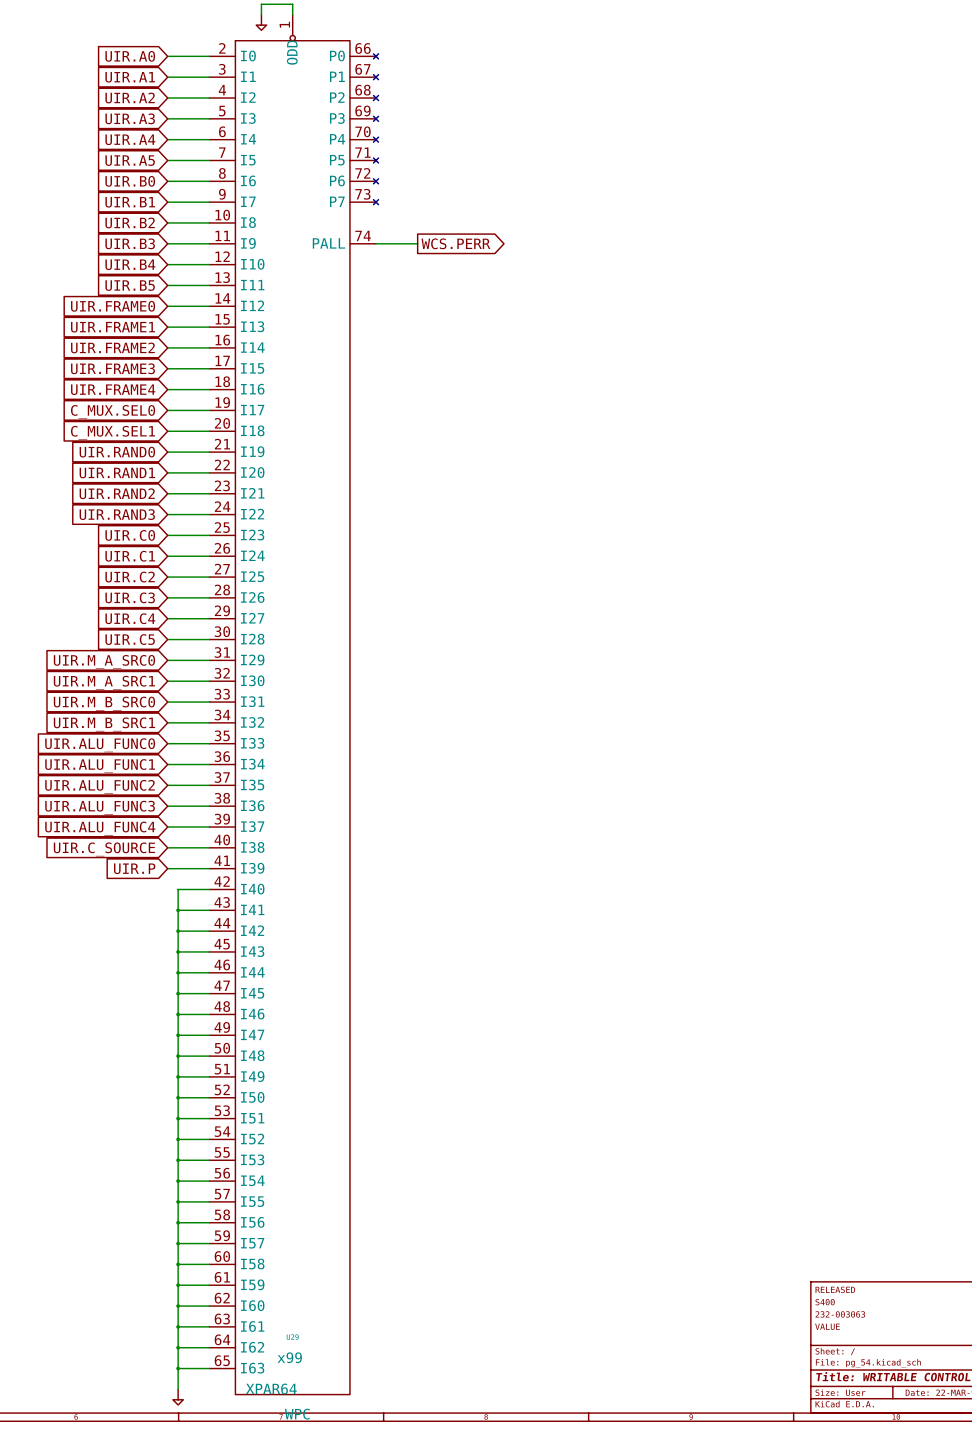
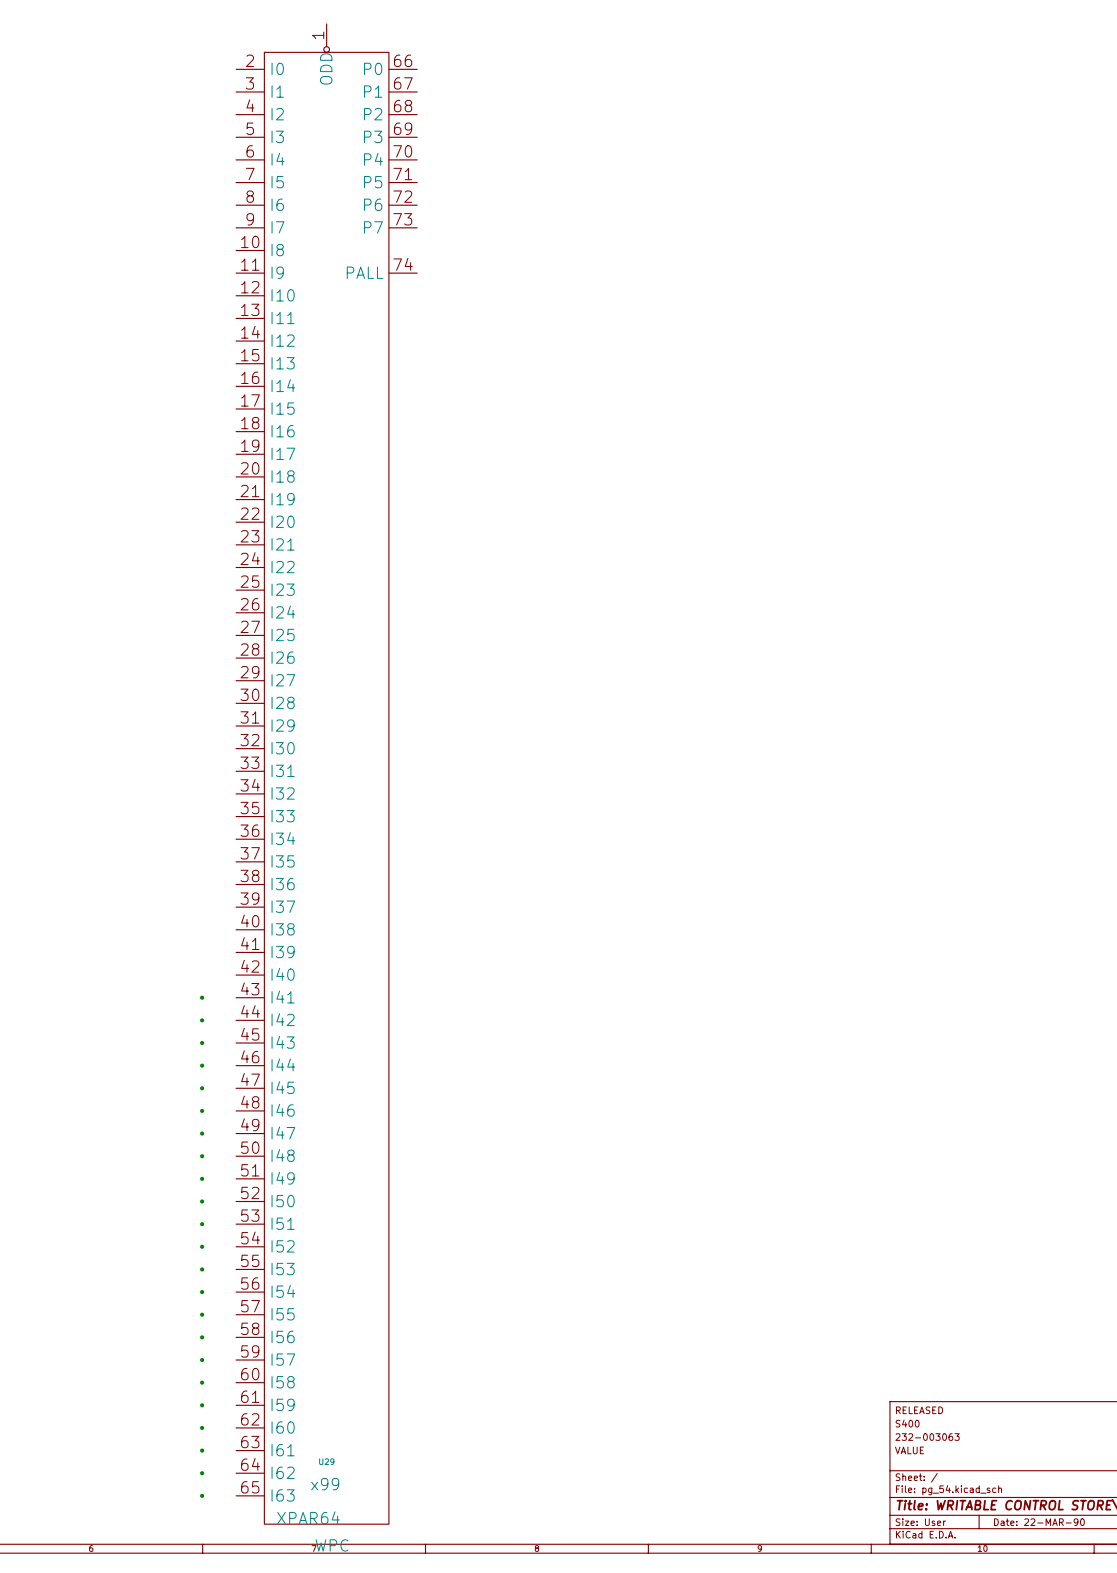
wire: (261, 14) (261, 4) (292, 4) (292, 14) -> none
power symbol: (261, 22) -> none
global label: UIR.A0 (130, 56) -> none
wire: (167, 56) (209, 56) -> none
no-connect mark: (376, 56) -> none
global label: UIR.A1 (130, 77) -> none
wire: (167, 77) (209, 77) -> none
no-connect mark: (376, 77) -> none
global label: UIR.A2 (130, 98) -> none
wire: (167, 98) (209, 98) -> none
no-connect mark: (376, 98) -> none
global label: UIR.A3 (130, 118) -> none
wire: (167, 118) (209, 118) -> none
no-connect mark: (376, 118) -> none
global label: UIR.A4 (130, 139) -> none
wire: (167, 139) (209, 139) -> none
no-connect mark: (376, 139) -> none
global label: UIR.A5 (130, 160) -> none
wire: (167, 160) (209, 160) -> none
no-connect mark: (376, 160) -> none
global label: UIR.B0 (130, 181) -> none
wire: (167, 181) (209, 181) -> none
no-connect mark: (376, 181) -> none
global label: UIR.B1 (130, 202) -> none
wire: (167, 202) (209, 202) -> none
no-connect mark: (376, 202) -> none
global label: UIR.B2 (130, 222) -> none
wire: (167, 222) (209, 222) -> none
global label: UIR.B3 (130, 243) -> none
wire: (167, 243) (209, 243) -> none
wire: (376, 243) (417, 243) -> none
global label: WCS.PERR (455, 243) -> none
global label: UIR.B4 (130, 264) -> none
wire: (167, 264) (209, 264) -> none
global label: UIR.B5 (130, 285) -> none
wire: (167, 285) (209, 285) -> none
global label: UIR.FRAME0 (113, 306) -> none
wire: (167, 306) (209, 306) -> none
global label: UIR.FRAME1 (113, 327) -> none
wire: (167, 327) (209, 327) -> none
global label: UIR.FRAME2 (112, 347) -> none
wire: (167, 347) (209, 347) -> none
global label: UIR.FRAME3 (112, 368) -> none
wire: (167, 368) (209, 368) -> none
global label: UIR.FRAME4 (113, 389) -> none
wire: (167, 389) (209, 389) -> none
wire: (167, 410) (209, 410) -> none
global label: C_MUX.SEL0 (113, 412) -> none
wire: (167, 431) (209, 431) -> none
global label: C_MUX.SEL1 (113, 432) -> none
global label: UIR.RAND0 (117, 452) -> none
wire: (167, 452) (209, 452) -> none
wire: (167, 472) (209, 472) -> none
global label: UIR.RAND1 (117, 473) -> none
global label: UIR.RAND2 (117, 493) -> none
wire: (167, 493) (209, 493) -> none
global label: UIR.RAND3 (117, 514) -> none
wire: (167, 514) (209, 514) -> none
global label: UIR.C0 (130, 535) -> none
wire: (167, 535) (209, 535) -> none
global label: UIR.C1 (130, 556) -> none
wire: (167, 556) (209, 556) -> none
global label: UIR.C2 (130, 577) -> none
wire: (167, 577) (209, 577) -> none
global label: UIR.C3 (130, 597) -> none
wire: (167, 597) (209, 597) -> none
global label: UIR.C4 (130, 618) -> none
wire: (167, 618) (209, 618) -> none
global label: UIR.C5 (130, 639) -> none
wire: (167, 639) (209, 639) -> none
wire: (167, 660) (209, 660) -> none
global label: UIR.M_A_SRC0 (104, 661) -> none
wire: (167, 681) (209, 681) -> none
global label: UIR.M_A_SRC1 (104, 682) -> none
wire: (167, 702) (209, 702) -> none
global label: UIR.M_B_SRC0 (104, 703) -> none
wire: (167, 722) (209, 722) -> none
global label: UIR.M_B_SRC1 (104, 724) -> none
wire: (167, 743) (209, 743) -> none
global label: UIR.ALU_FUNC0 (100, 745) -> none
wire: (167, 764) (209, 764) -> none
global label: UIR.ALU_FUNC1 (100, 766) -> none
wire: (167, 785) (209, 785) -> none
global label: UIR.ALU_FUNC2 (100, 786) -> none
wire: (167, 806) (209, 806) -> none
global label: UIR.ALU_FUNC3 (100, 807) -> none
wire: (167, 827) (209, 827) -> none
global label: UIR.ALU_FUNC4 (100, 828) -> none
wire: (167, 847) (209, 847) -> none
global label: UIR.C_SOURCE (104, 849) -> none
global label: UIR.P (134, 868) -> none
wire: (167, 868) (209, 868) -> none
wire: (209, 889) (178, 889) (178, 1389) -> none
wire: (178, 910) (209, 910) -> none
wire: (178, 931) (209, 931) -> none
wire: (178, 951) (209, 951) -> none
wire: (178, 972) (209, 972) -> none
wire: (178, 993) (209, 993) -> none
wire: (178, 1014) (209, 1014) -> none
wire: (178, 1035) (209, 1035) -> none
wire: (178, 1056) (209, 1056) -> none
wire: (178, 1076) (209, 1076) -> none
wire: (178, 1097) (209, 1097) -> none
wire: (178, 1118) (209, 1118) -> none
wire: (178, 1139) (209, 1139) -> none
wire: (178, 1160) (209, 1160) -> none
wire: (178, 1181) (209, 1181) -> none
wire: (178, 1201) (209, 1201) -> none
wire: (178, 1222) (209, 1222) -> none
wire: (178, 1243) (209, 1243) -> none
wire: (178, 1264) (209, 1264) -> none
wire: (178, 1285) (209, 1285) -> none
wire: (178, 1306) (209, 1306) -> none
wire: (178, 1326) (209, 1326) -> none
wire: (178, 1347) (209, 1347) -> none
wire: (178, 1368) (209, 1368) -> none
power symbol: (178, 1397) -> none

